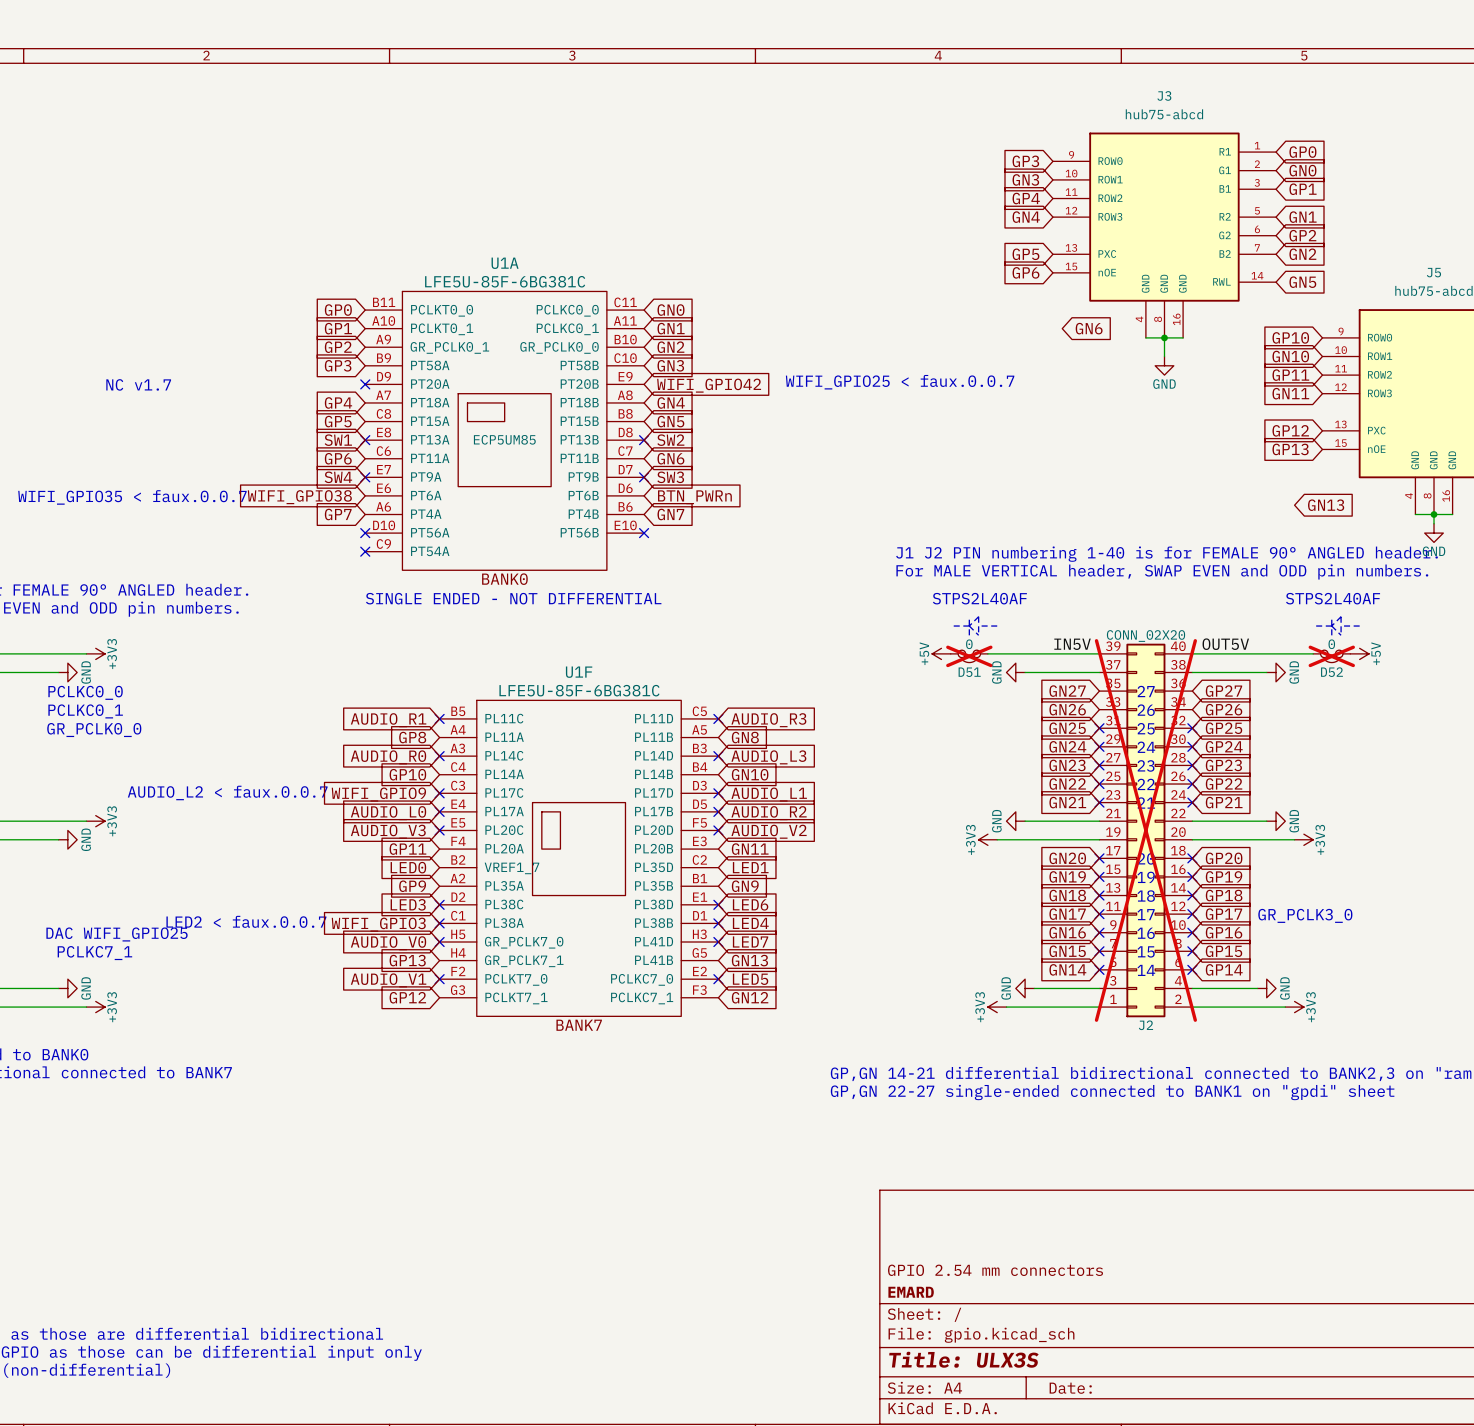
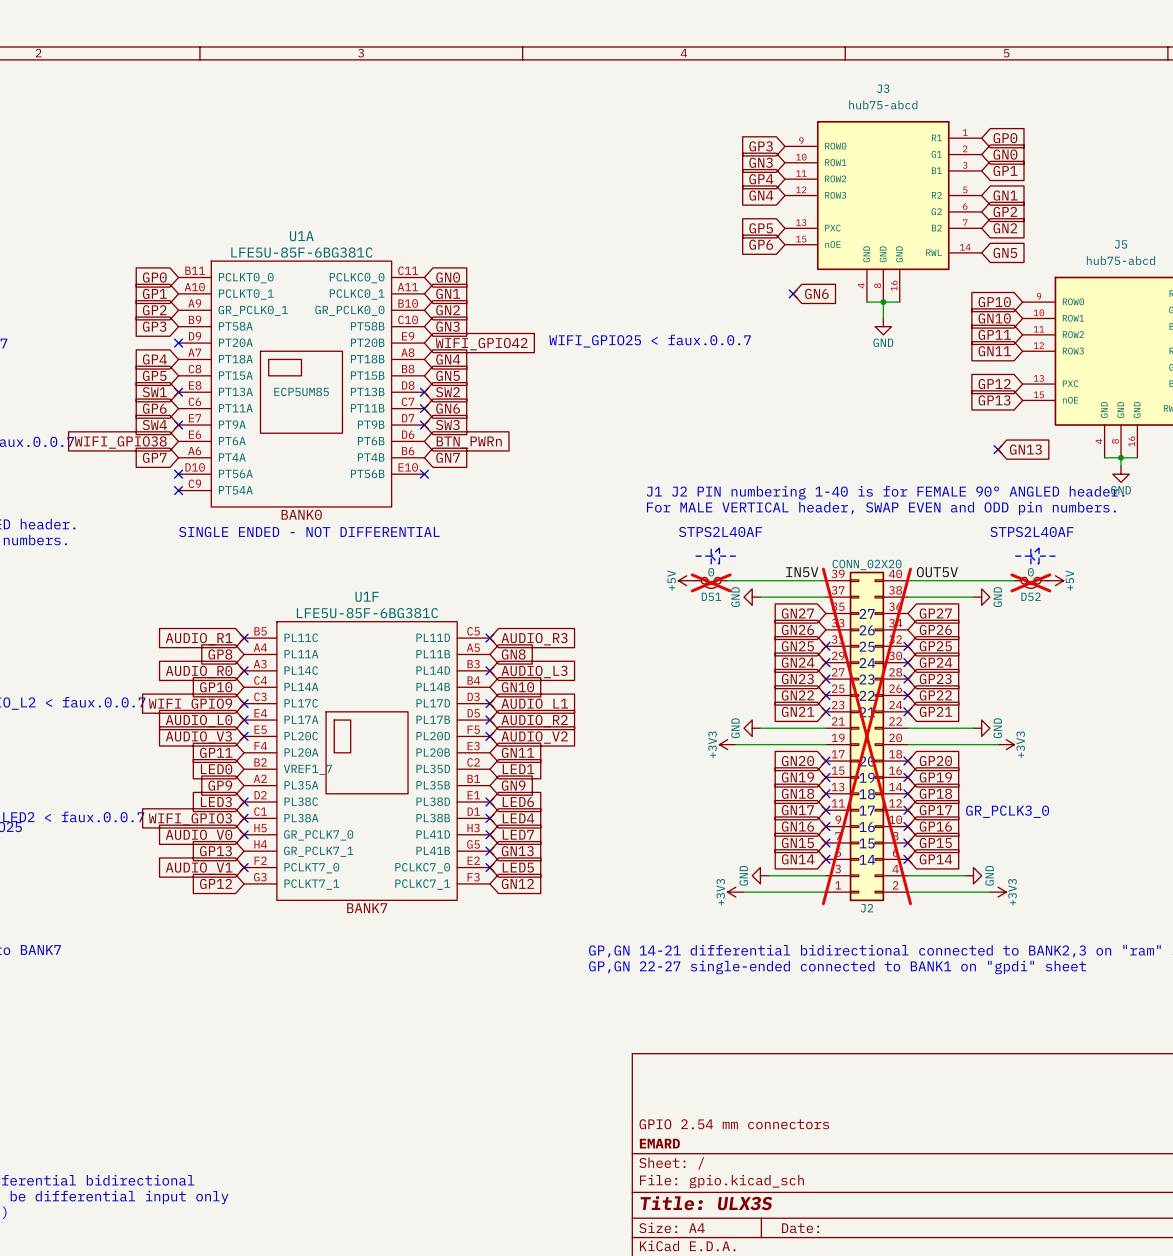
no-connect mark: none -> (793, 293)
no-connect mark: none -> (424, 408)
no-connect mark: none -> (998, 449)
no-connect mark: none -> (489, 851)

